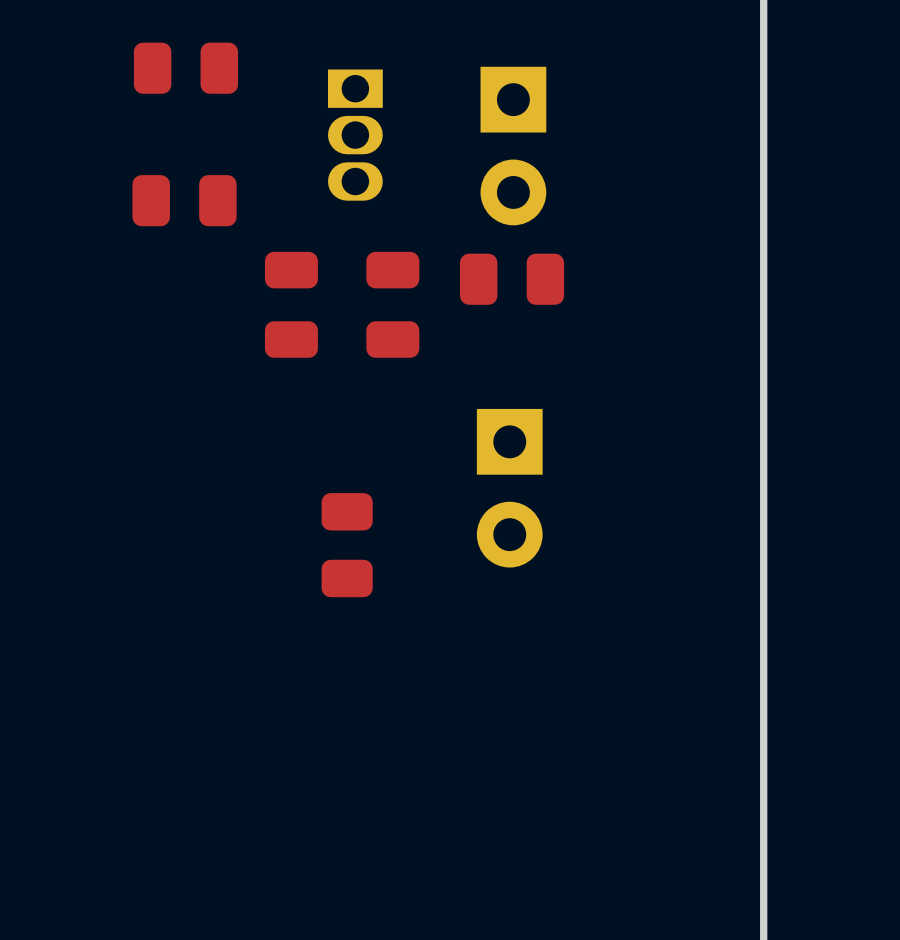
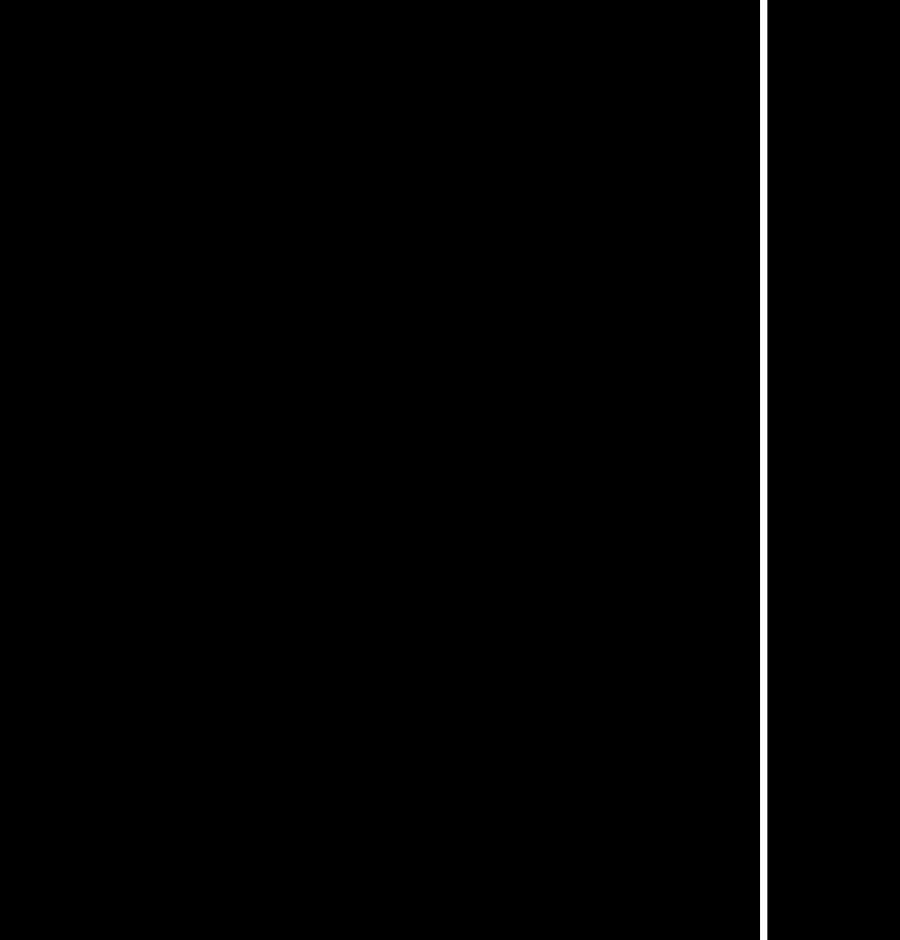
part: (185, 68) -> none
part: (355, 135) -> none
part: (513, 146) -> none
part: (184, 200) -> none
part: (512, 279) -> none
part: (291, 304) -> none
part: (392, 304) -> none
part: (509, 488) -> none
part: (347, 545) -> none

